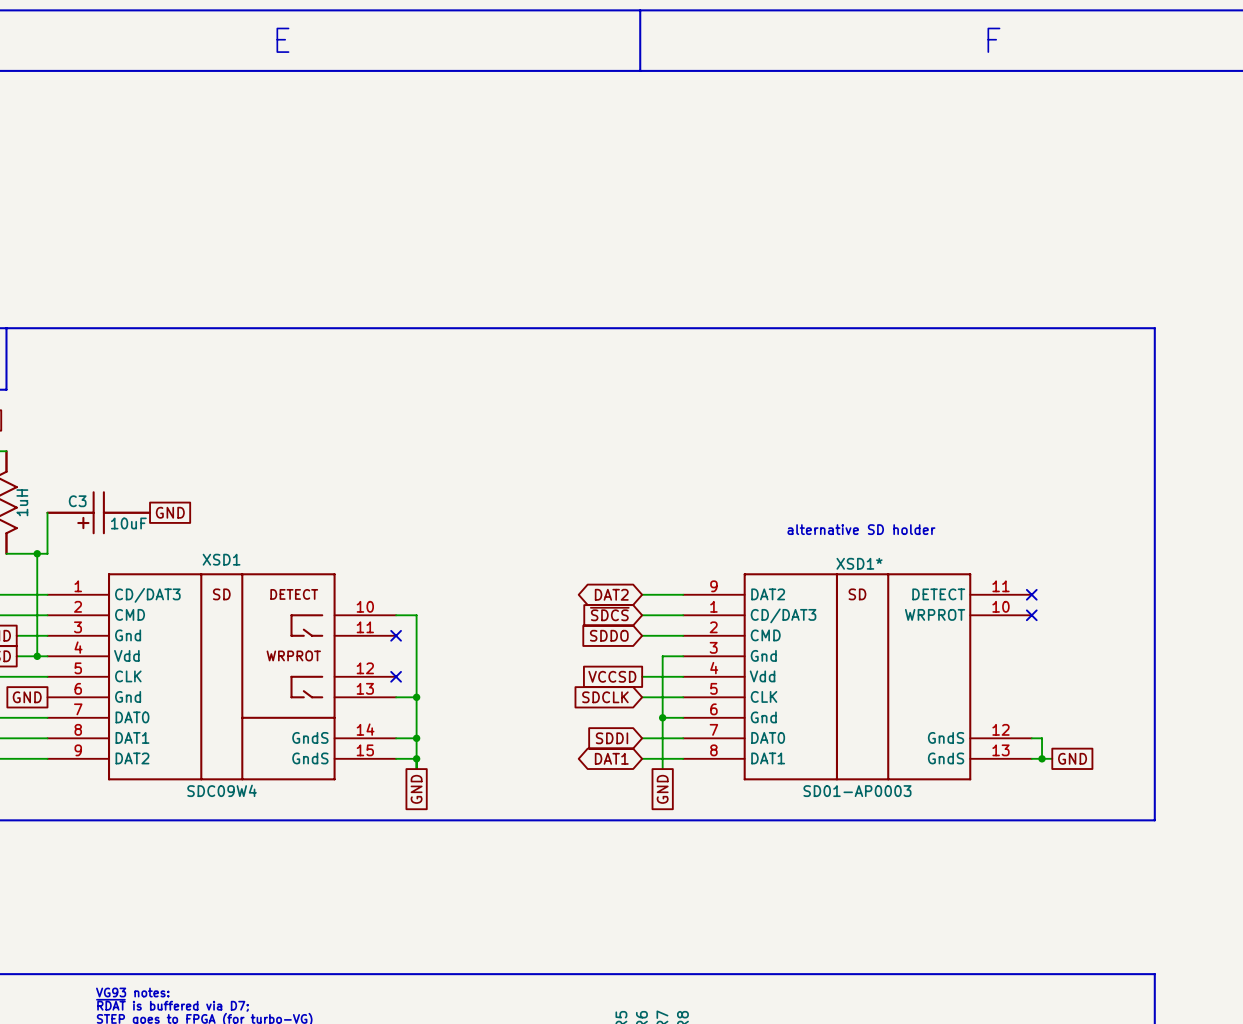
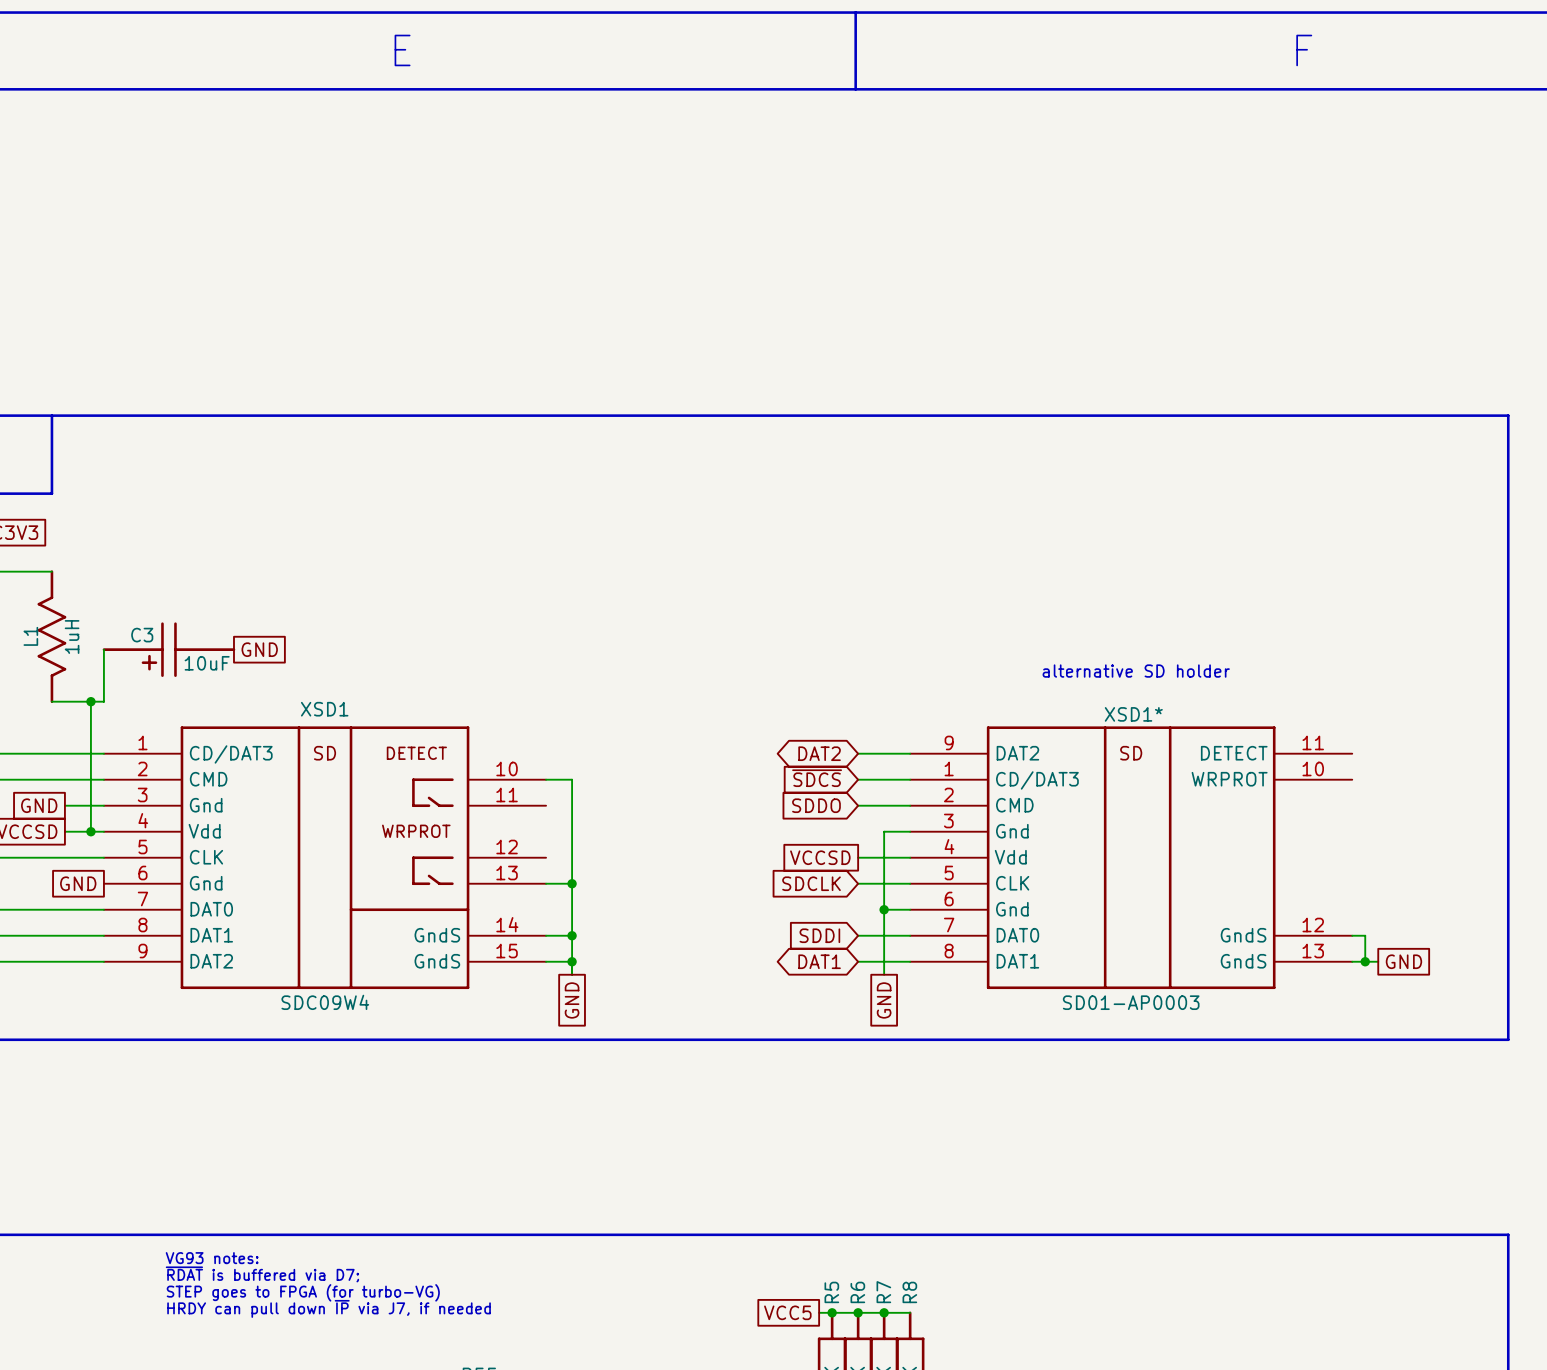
no-connect mark: (1031, 594) -> none
no-connect mark: (1031, 615) -> none
no-connect mark: (396, 635) -> none
no-connect mark: (396, 676) -> none

